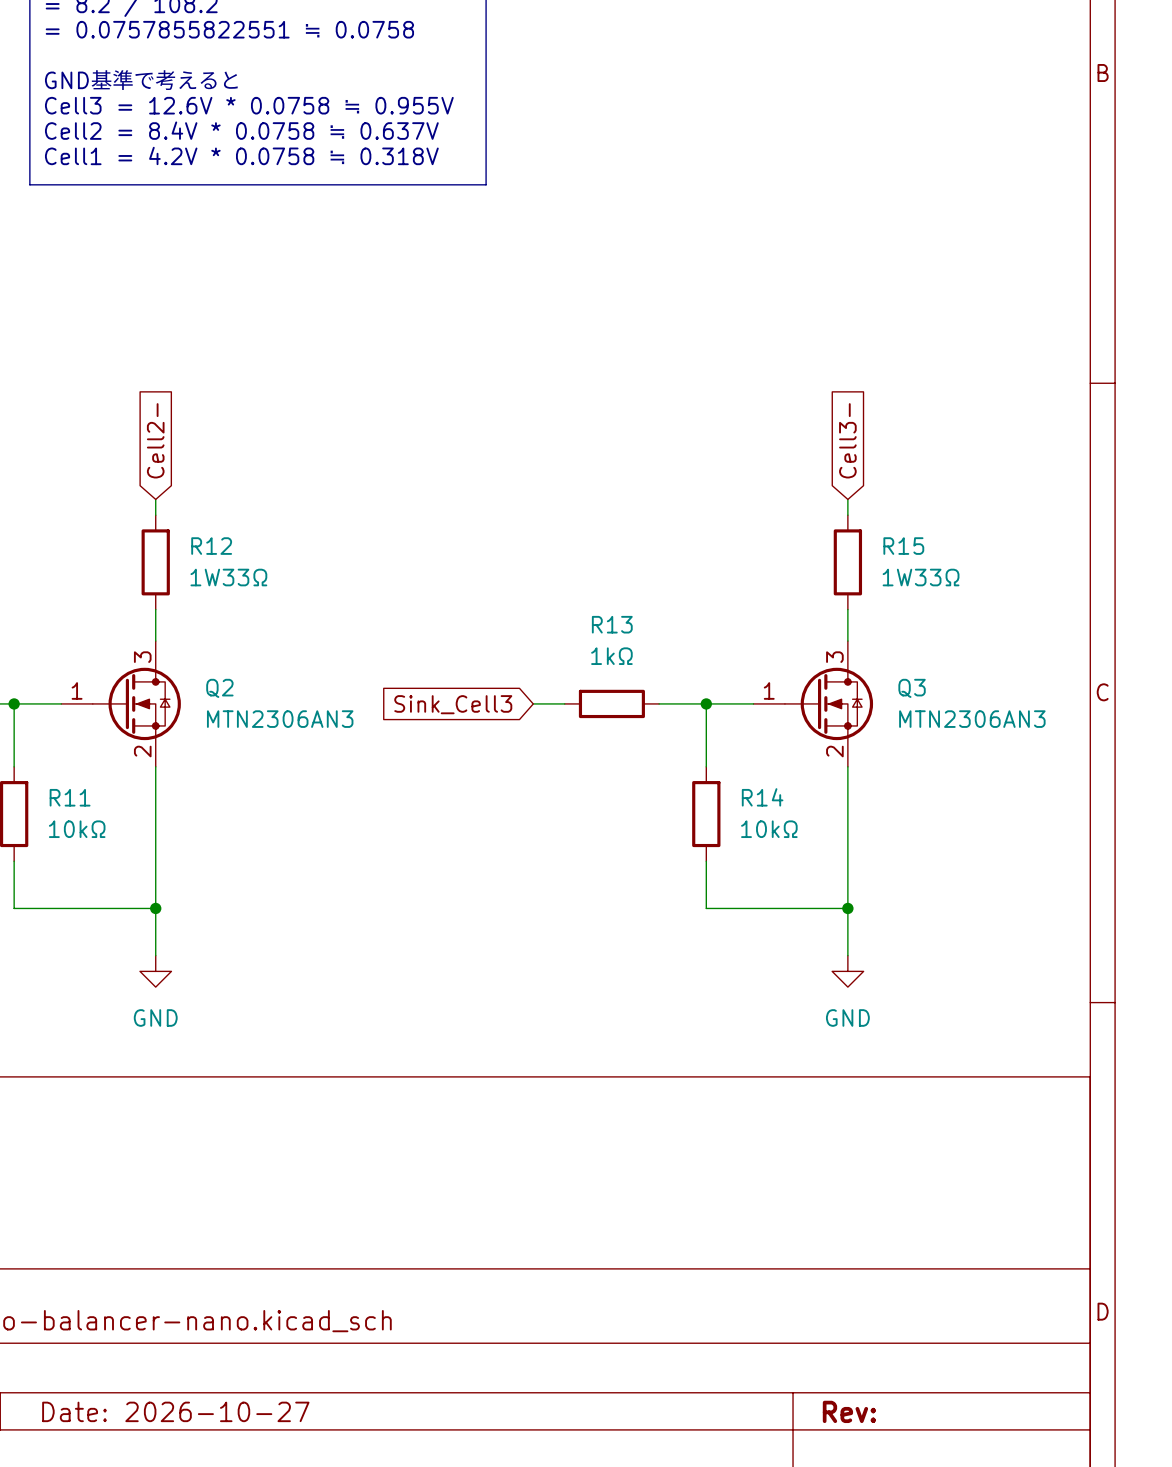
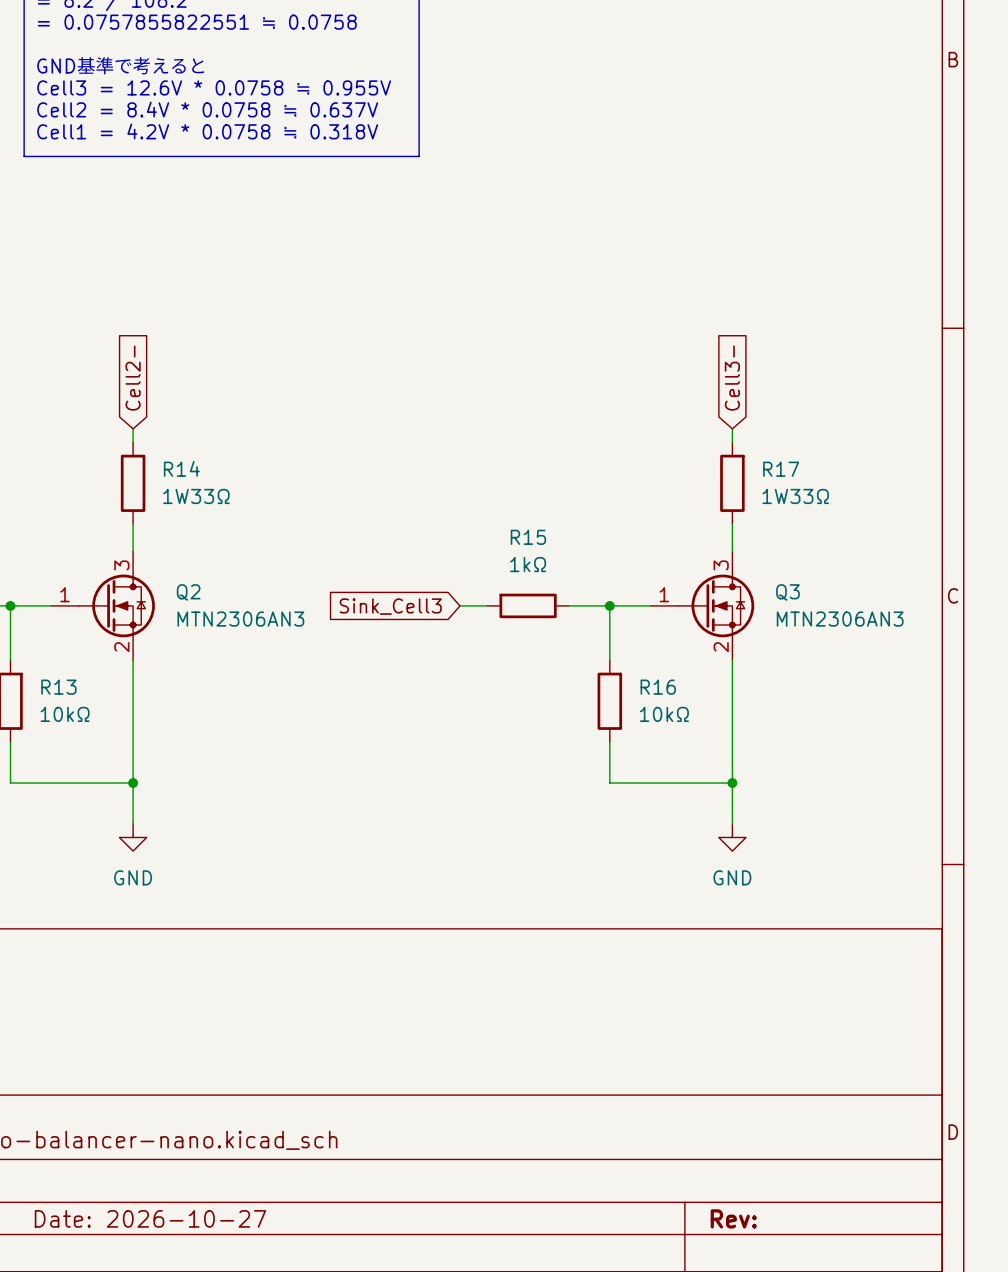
R12 name: R12 (211, 546) -> R14 (181, 468)
R15 name: R15 (903, 546) -> R17 (781, 469)
R13 name: R13 (612, 624) -> R15 (528, 537)
R11 name: R11 (70, 797) -> R13 (58, 687)
R14 name: R14 (762, 797) -> R16 (658, 687)

